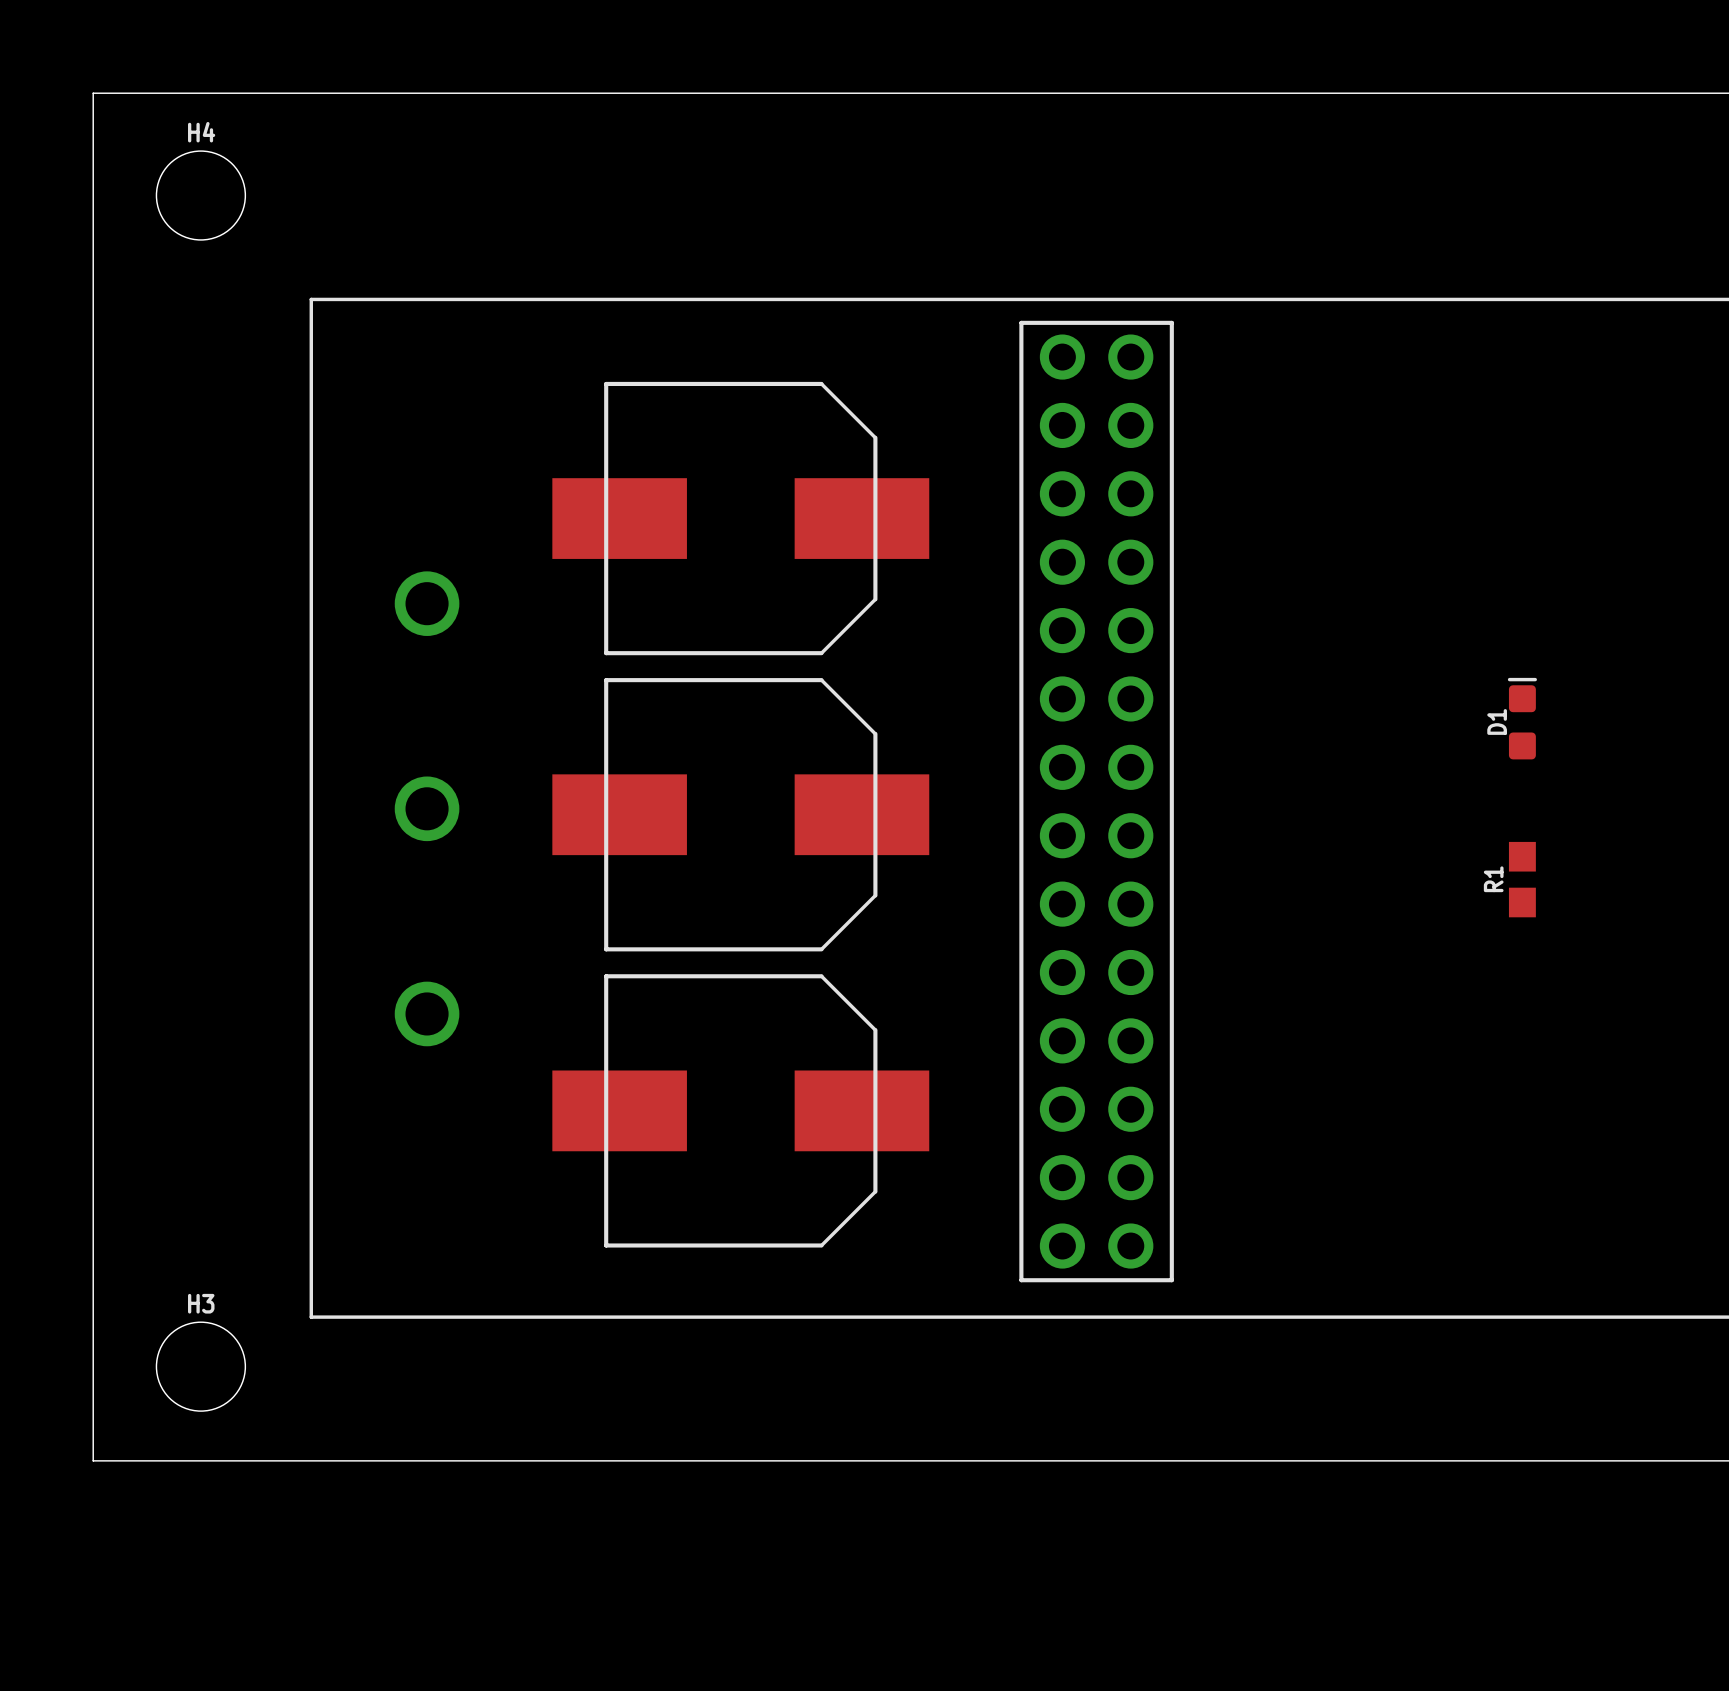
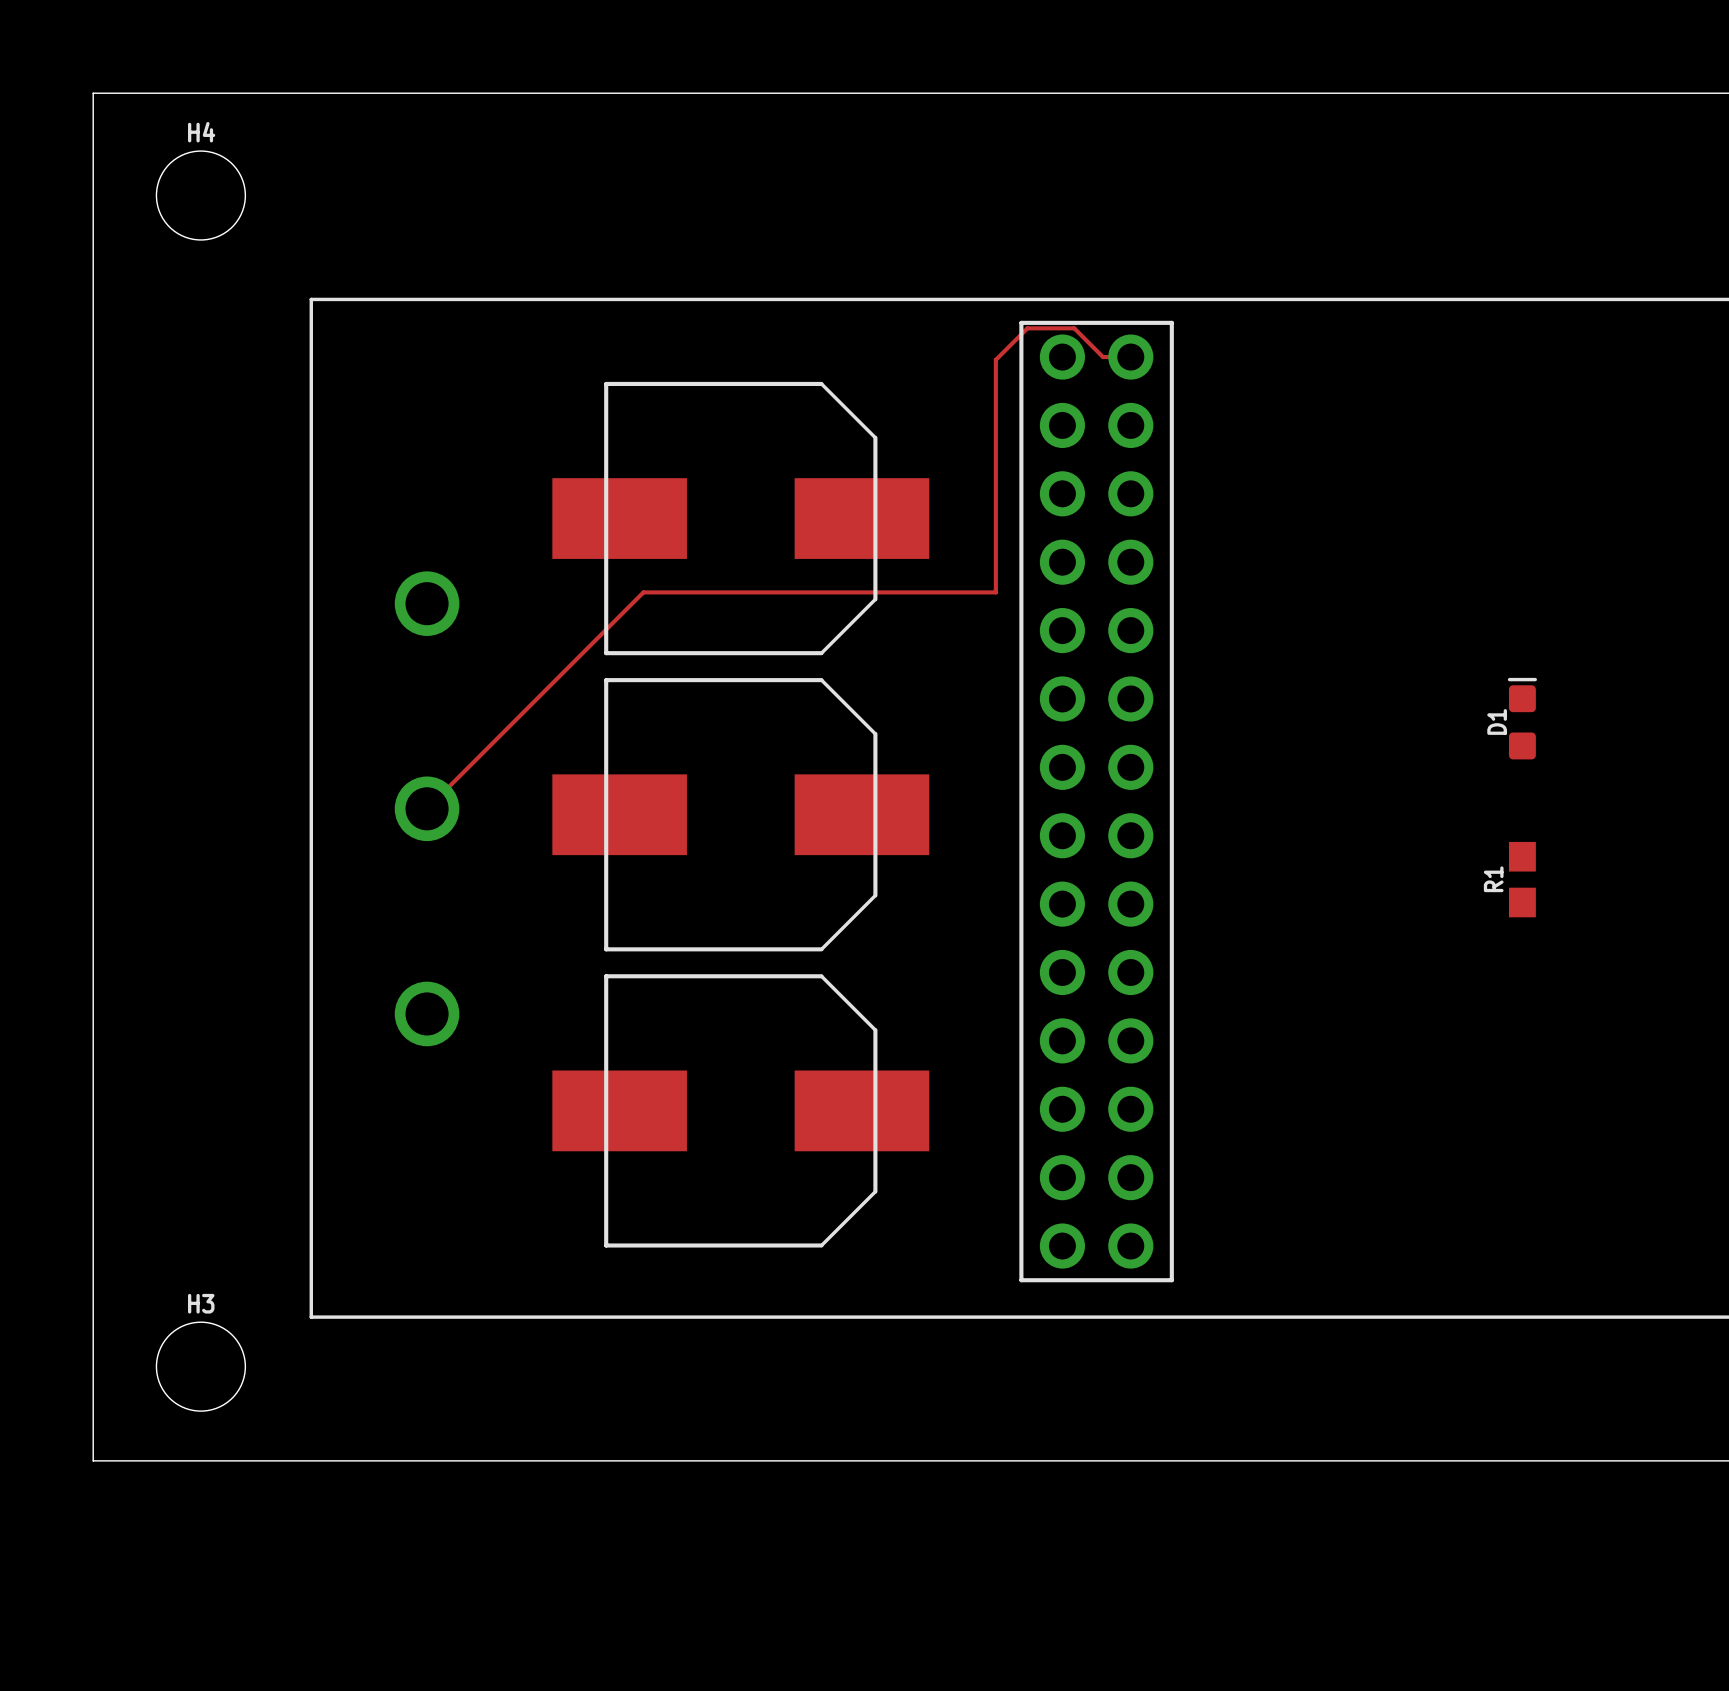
track: none -> (1130, 357) (1103, 357) (1074, 328) (1027, 328) (995, 359) (995, 592) (643, 592) (427, 808)

